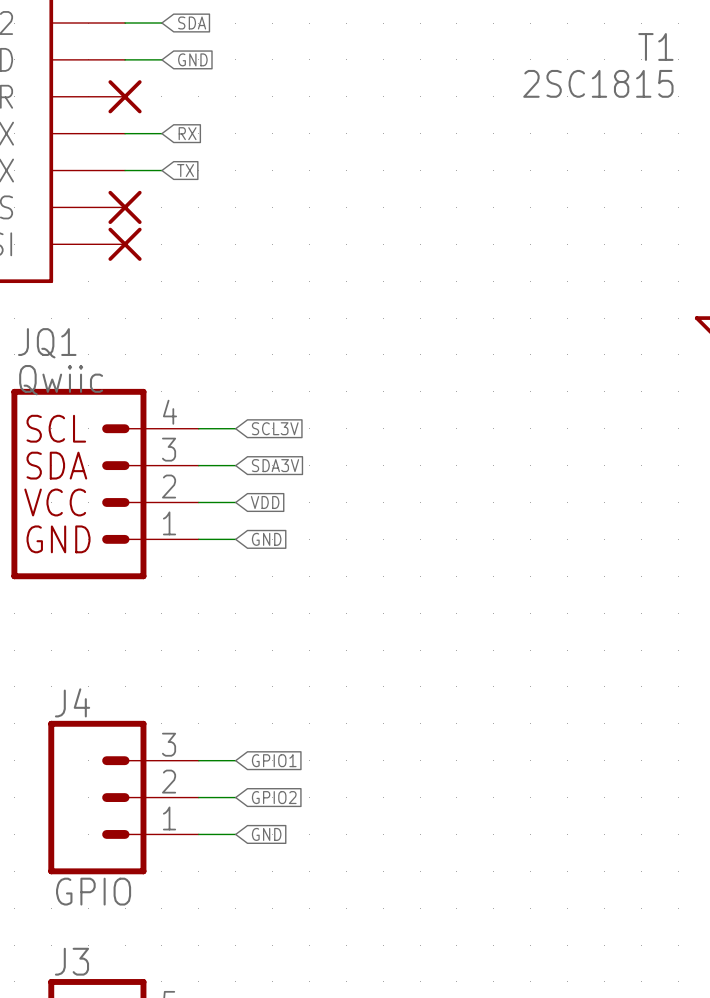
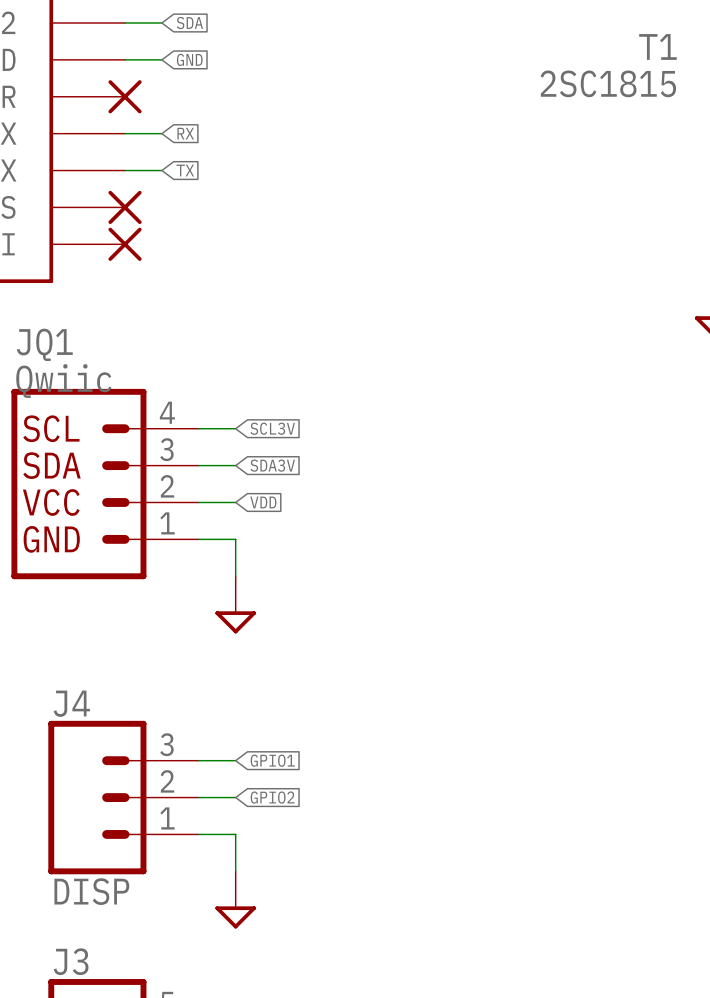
wire: none -> (235, 539) (235, 576)
global label: GND (266, 539) -> none
power symbol: none -> (235, 604)
wire: none -> (235, 834) (235, 871)
global label: GND (266, 834) -> none
J4 value: GPIO (93, 891) -> DISP (91, 891)
power symbol: none -> (235, 899)

